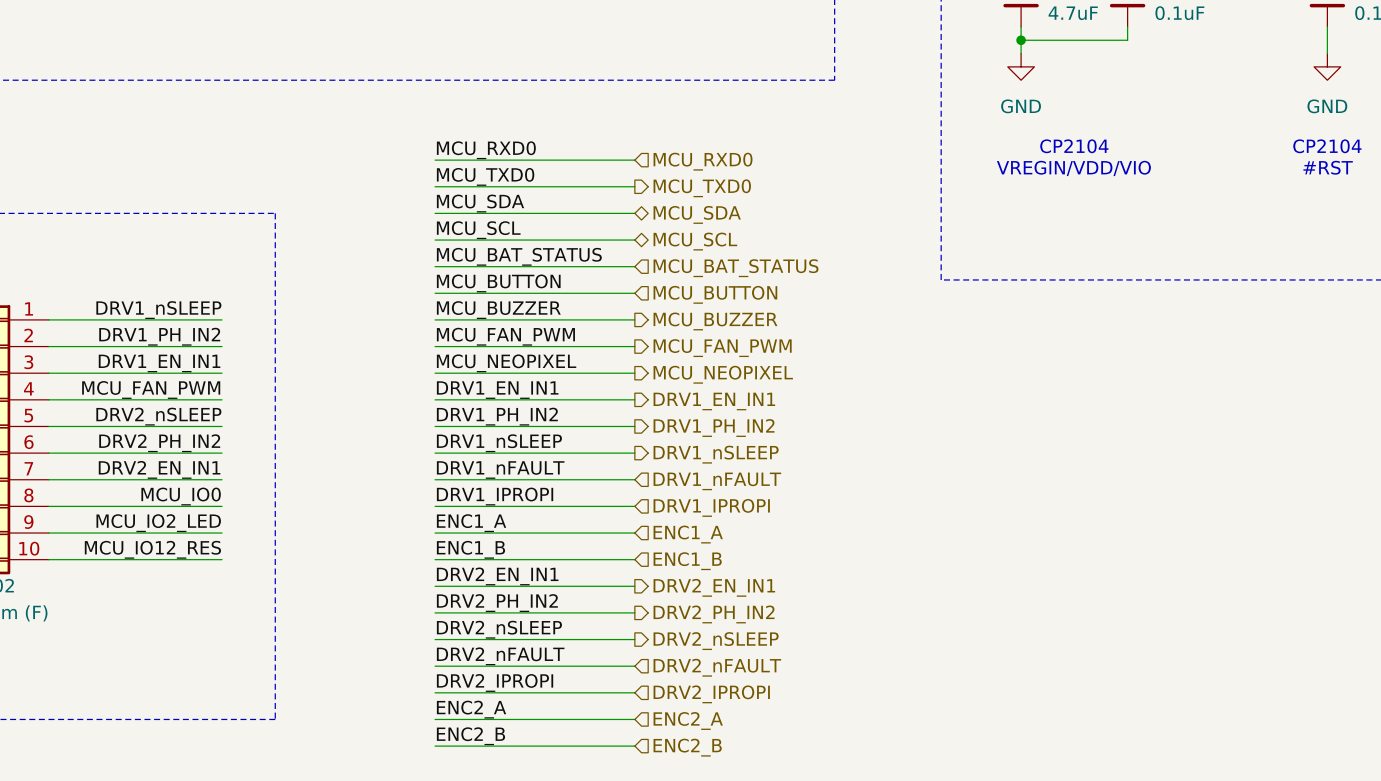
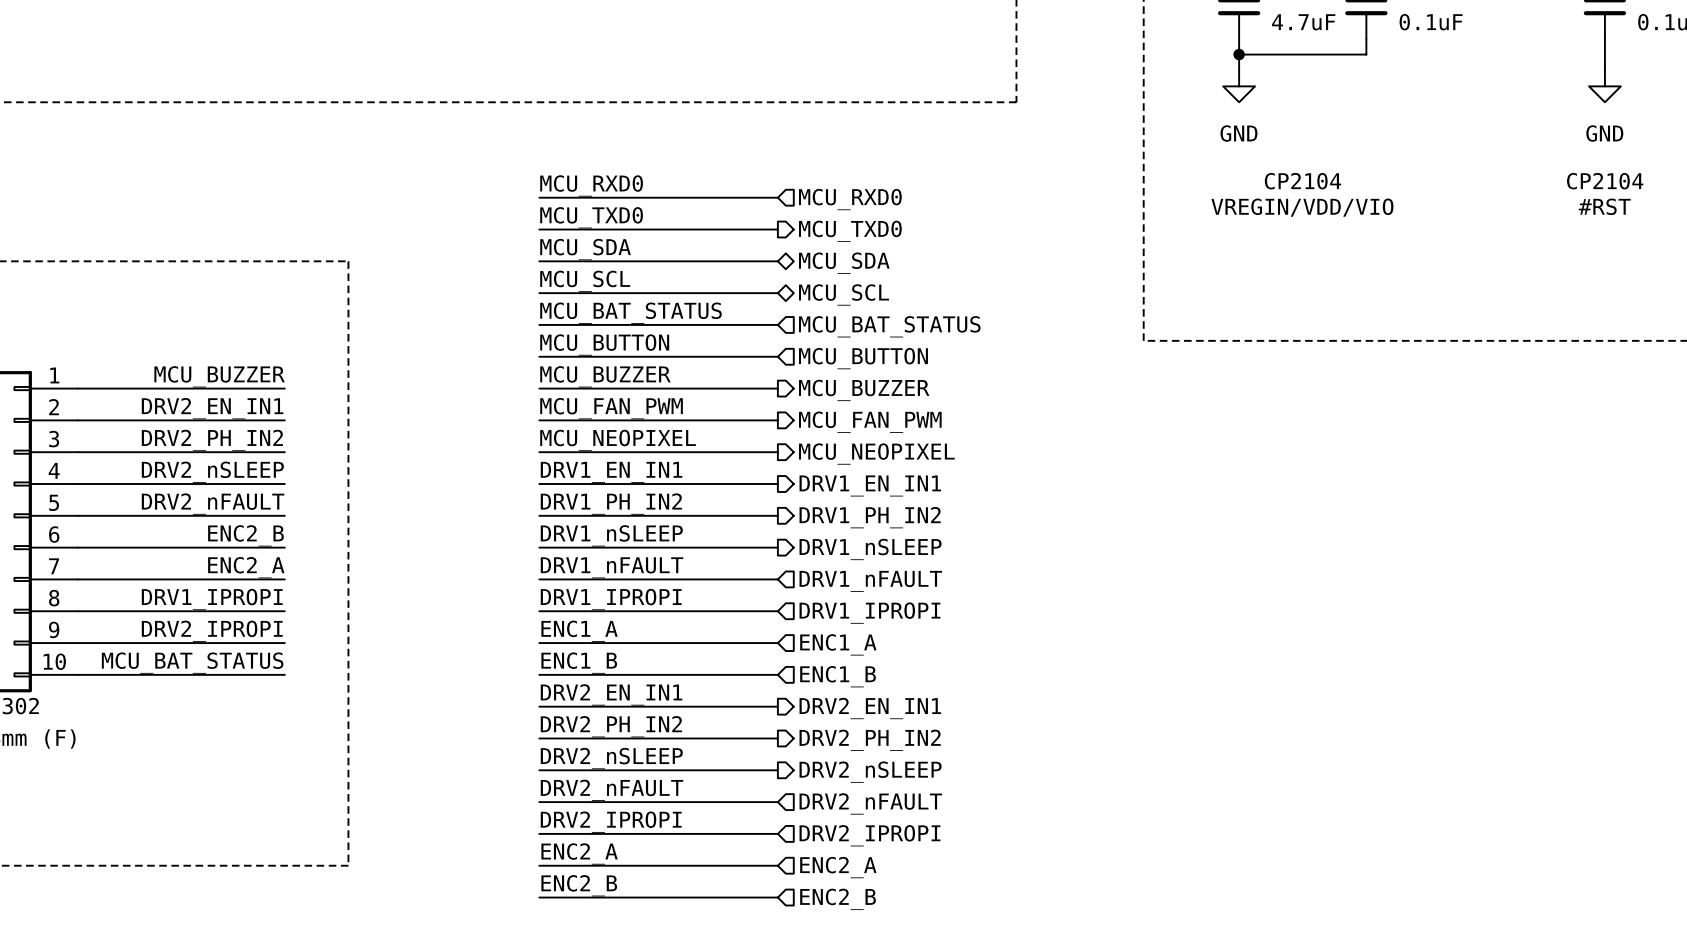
label: DRV1_nSLEEP (158, 310) -> MCU_BUZZER (219, 376)
label: DRV1_PH_IN2 (159, 336) -> DRV2_EN_IN1 (212, 408)
label: DRV1_EN_IN1 (159, 363) -> DRV2_PH_IN2 (212, 440)
label: MCU_FAN_PWM (151, 389) -> DRV2_nSLEEP (212, 472)
label: DRV2_nSLEEP (158, 416) -> DRV2_nFAULT (213, 504)
label: DRV2_PH_IN2 (159, 443) -> ENC2_B (245, 535)
label: DRV2_EN_IN1 (159, 469) -> ENC2_A (246, 567)
label: MCU_IO0 (181, 496) -> DRV1_IPROPI (212, 599)
label: MCU_IO2_LED (158, 523) -> DRV2_IPROPI (212, 631)
label: MCU_IO12_RES (152, 549) -> MCU_BAT_STATUS (192, 663)

